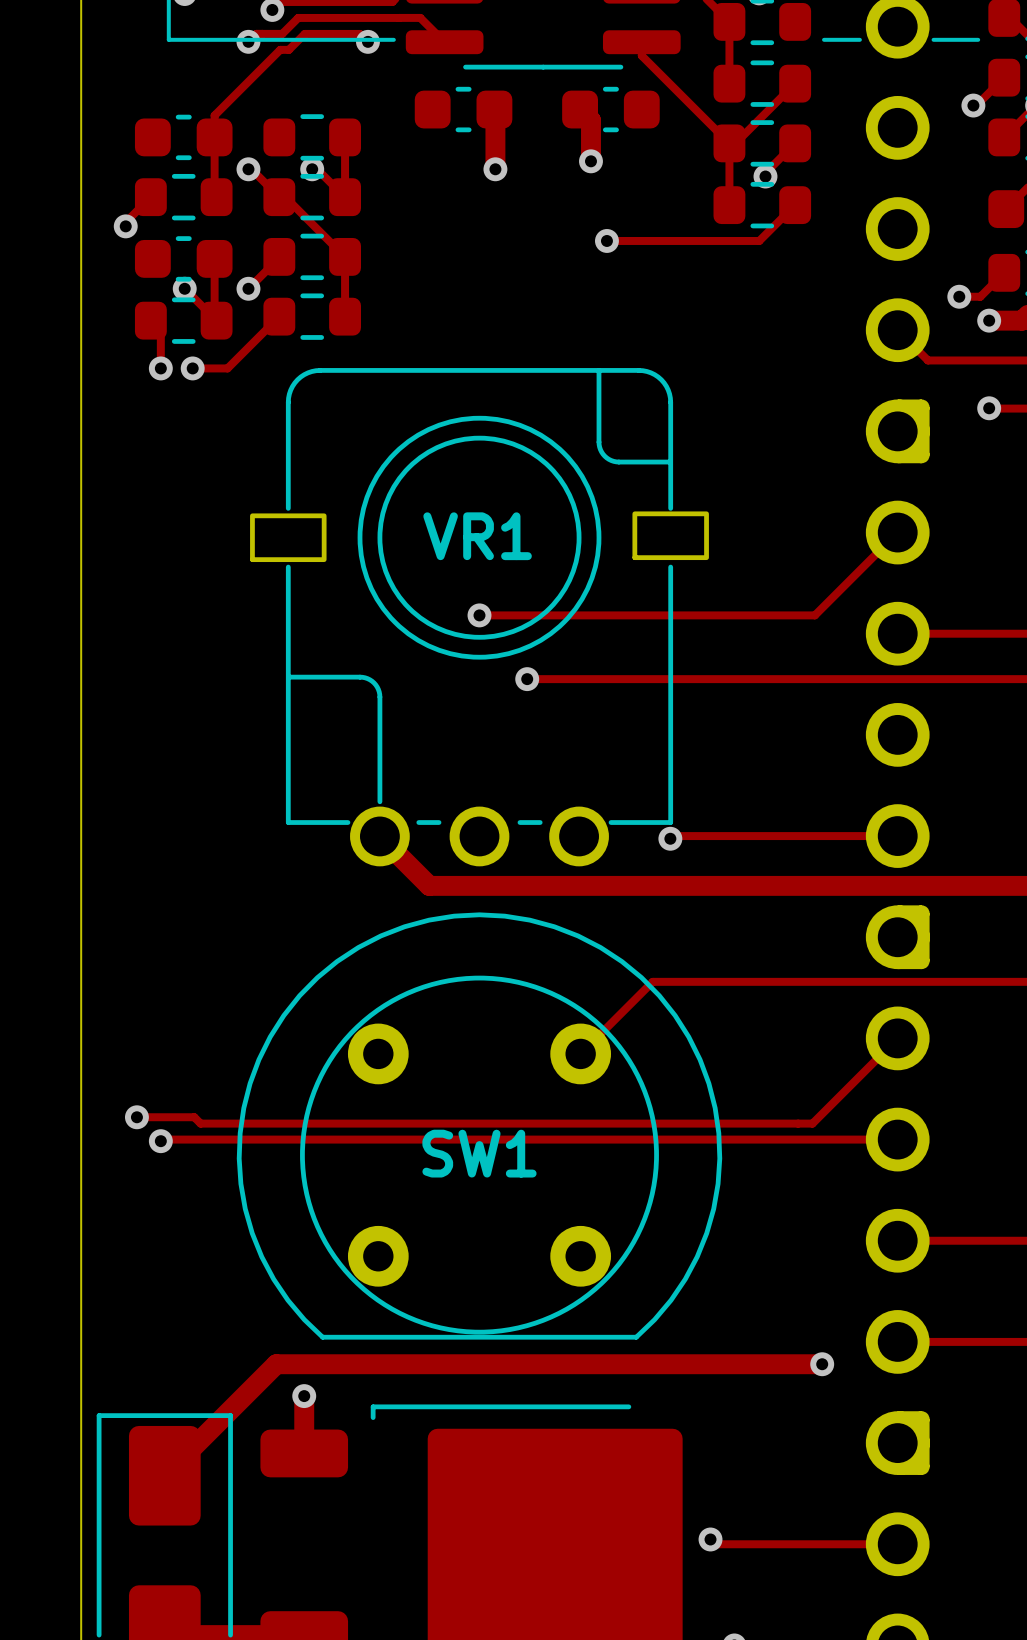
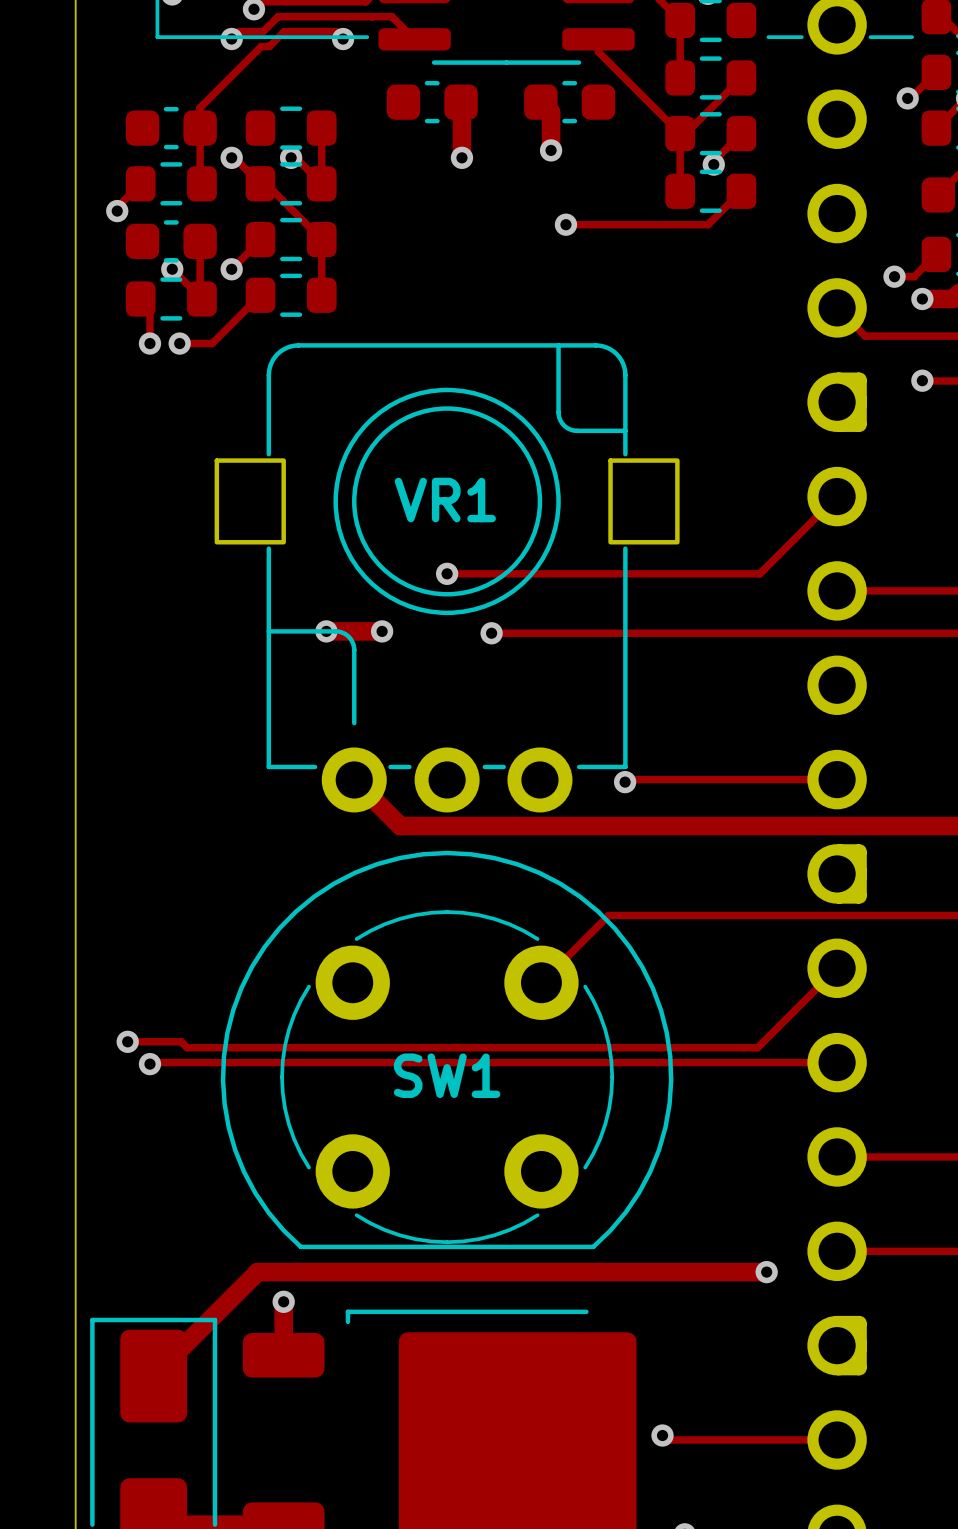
part footprint: [250, 368, 709, 867] -> [214, 343, 680, 813]
track: none -> (326, 631) (382, 631)
via: none -> (326, 631)
via: none -> (382, 631)
part footprint: [236, 912, 723, 1340] -> [220, 850, 674, 1250]

